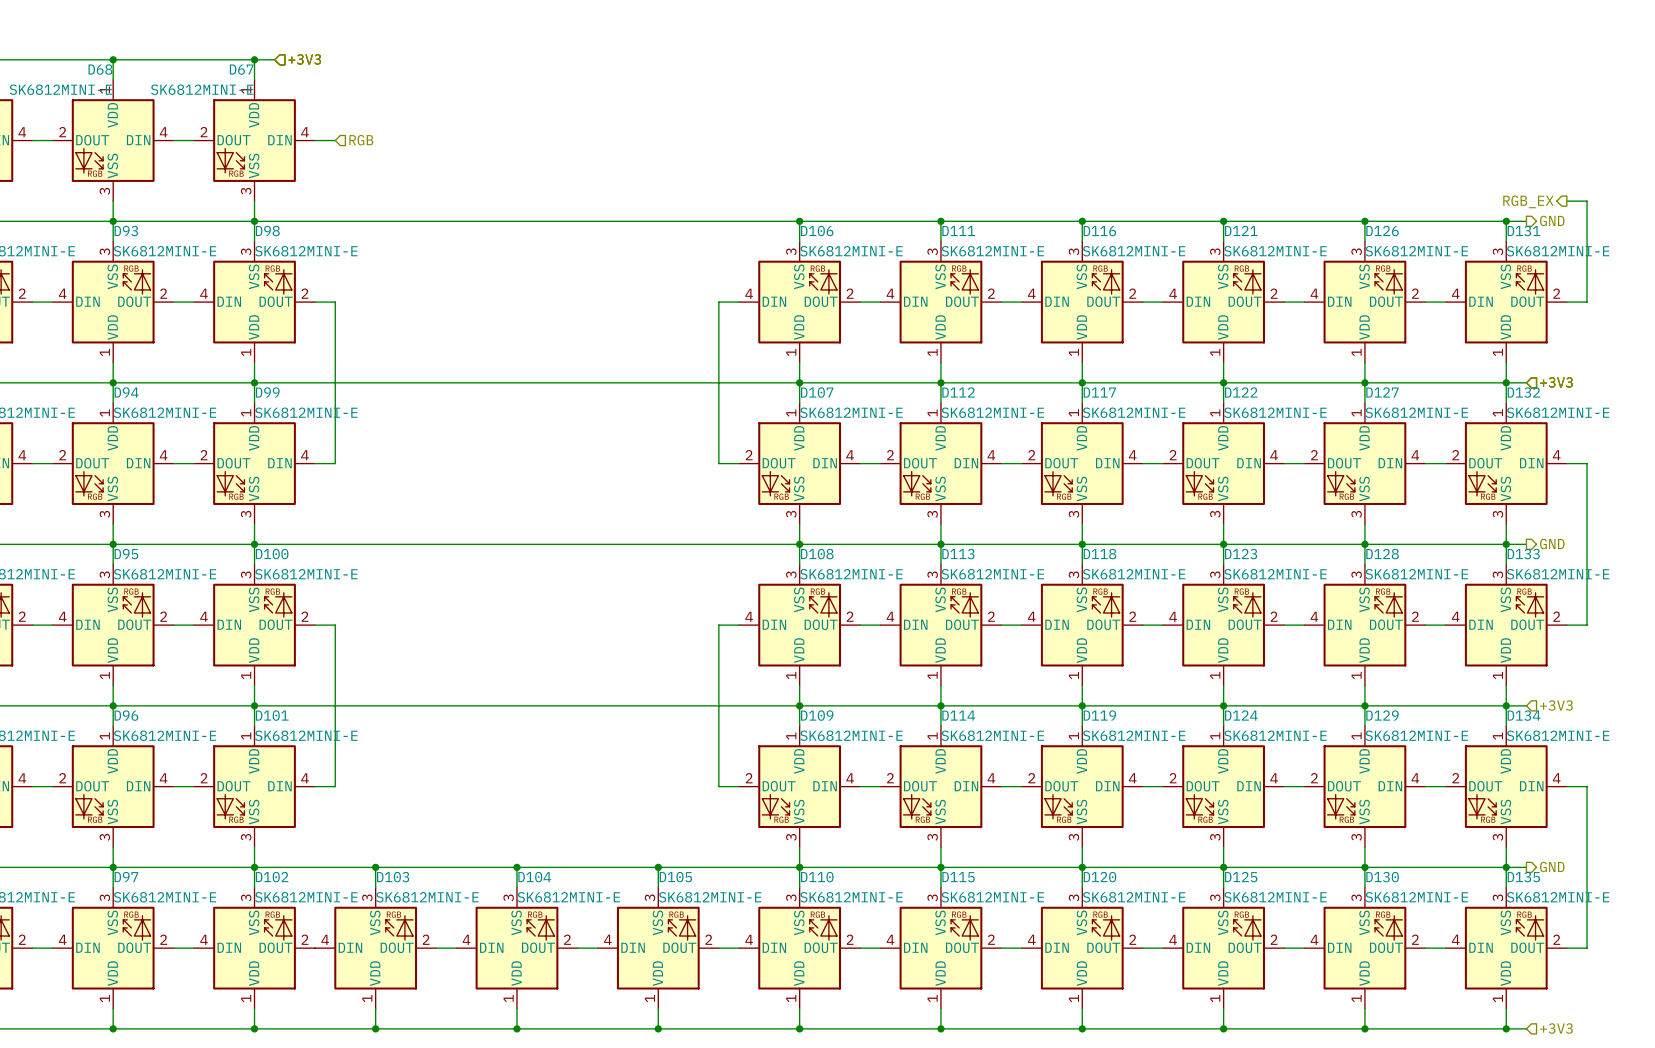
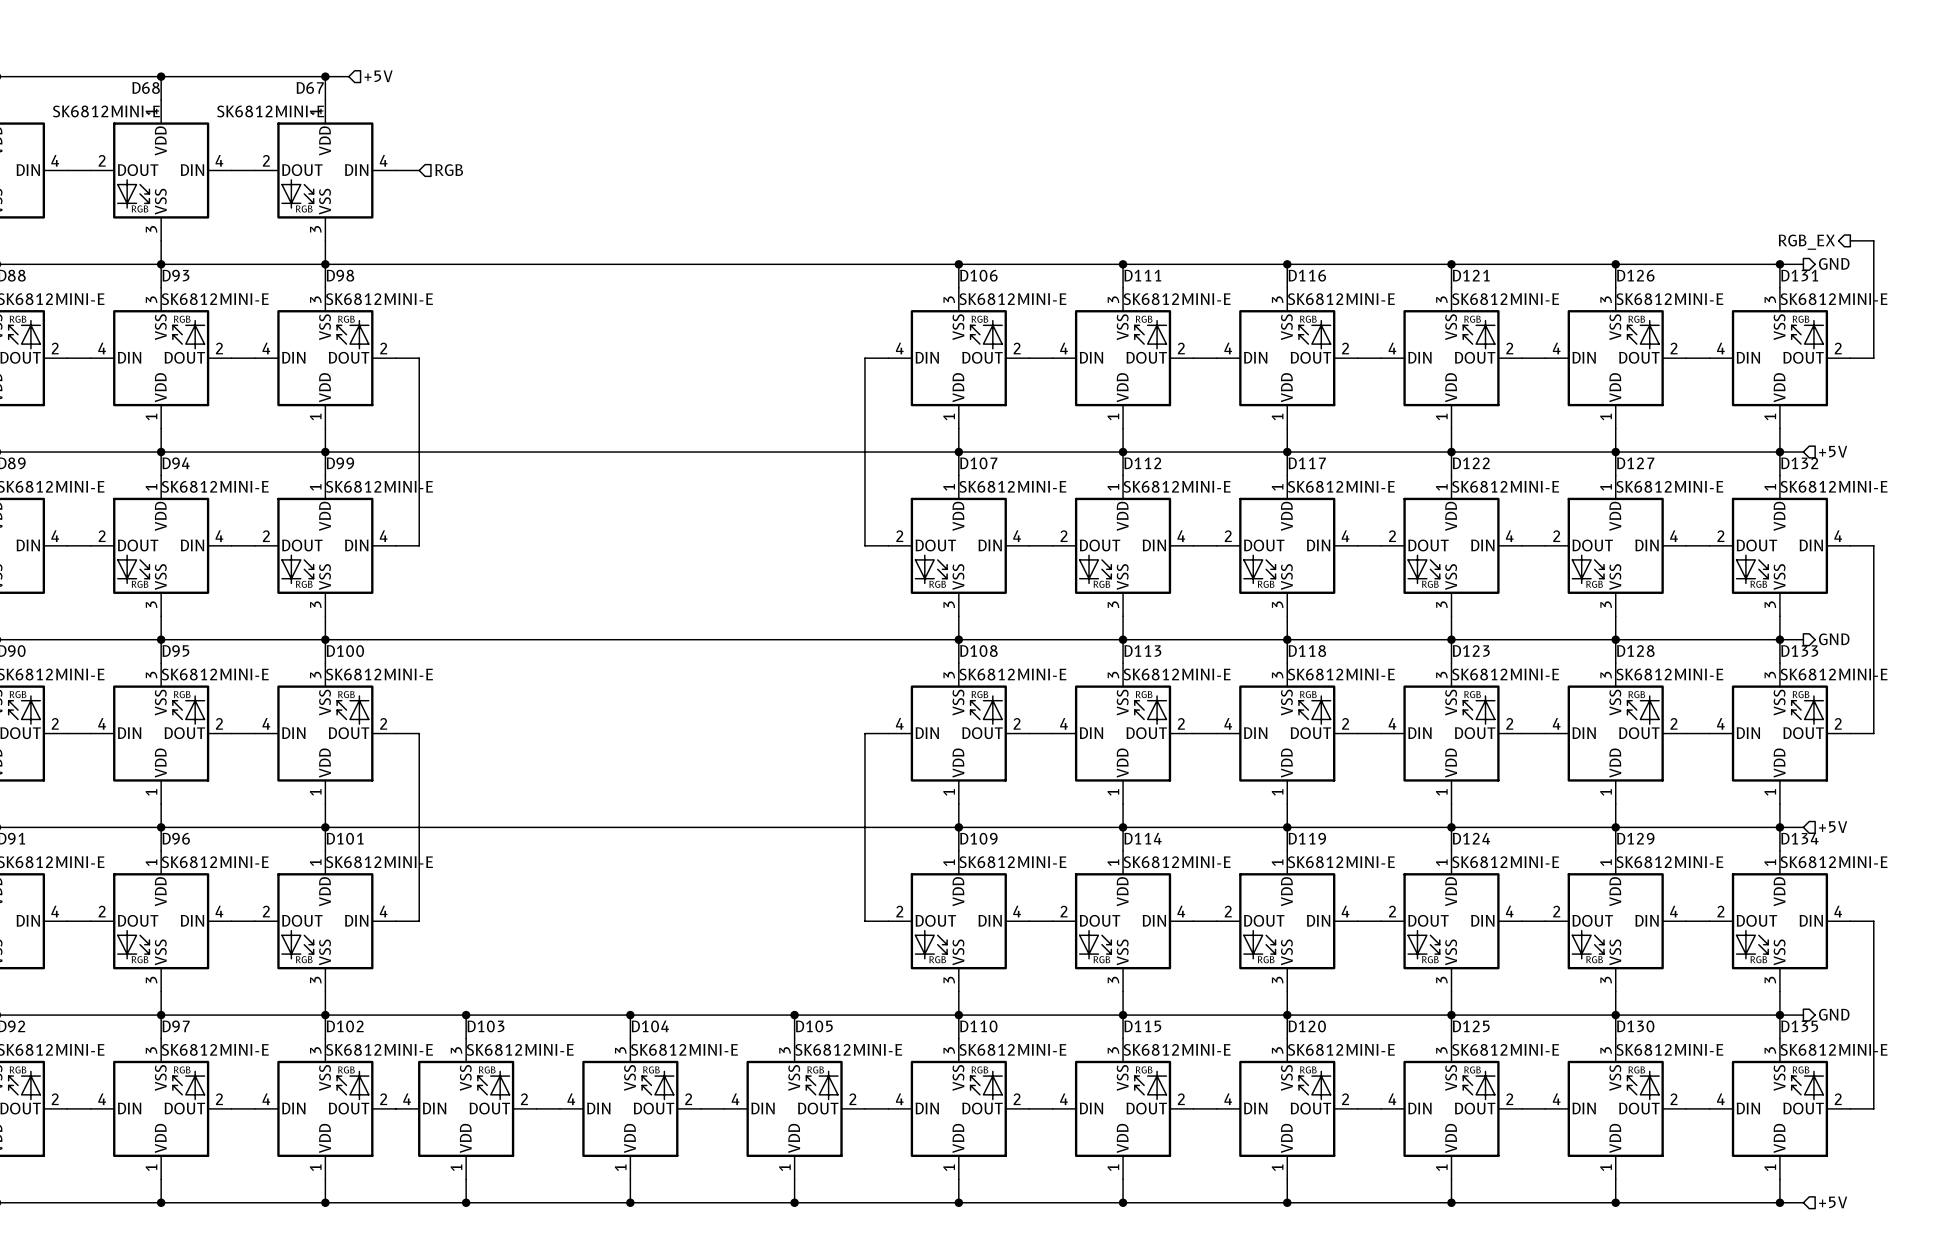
hierarchical label: +3V3 (304, 59) -> +5V (378, 76)
hierarchical label: +3V3 (1556, 382) -> +5V (1833, 451)
hierarchical label: +3V3 (1556, 705) -> +5V (1833, 827)
hierarchical label: +3V3 (1556, 1028) -> +5V (1833, 1202)

